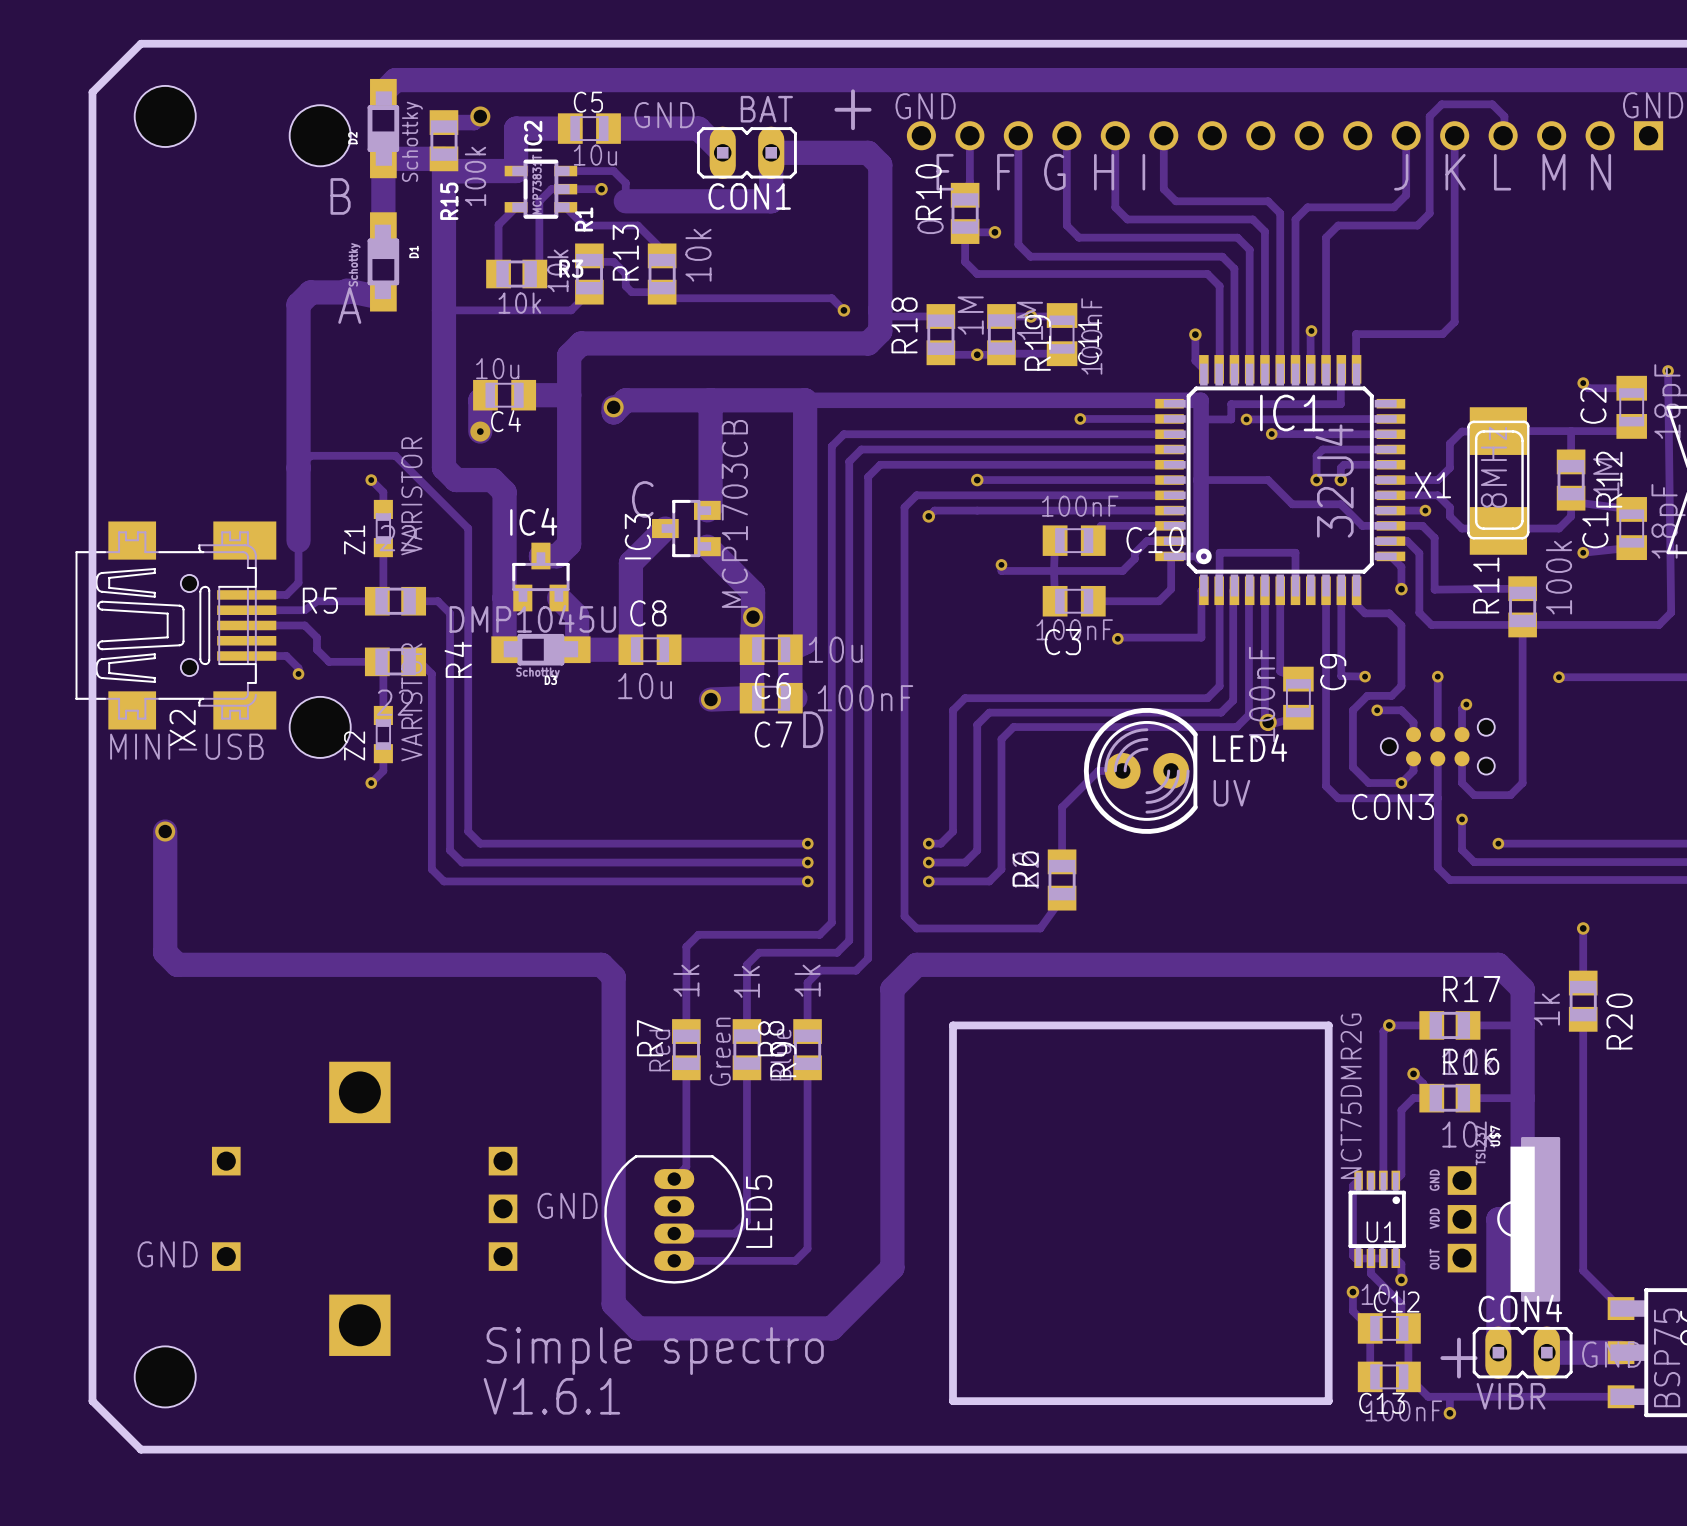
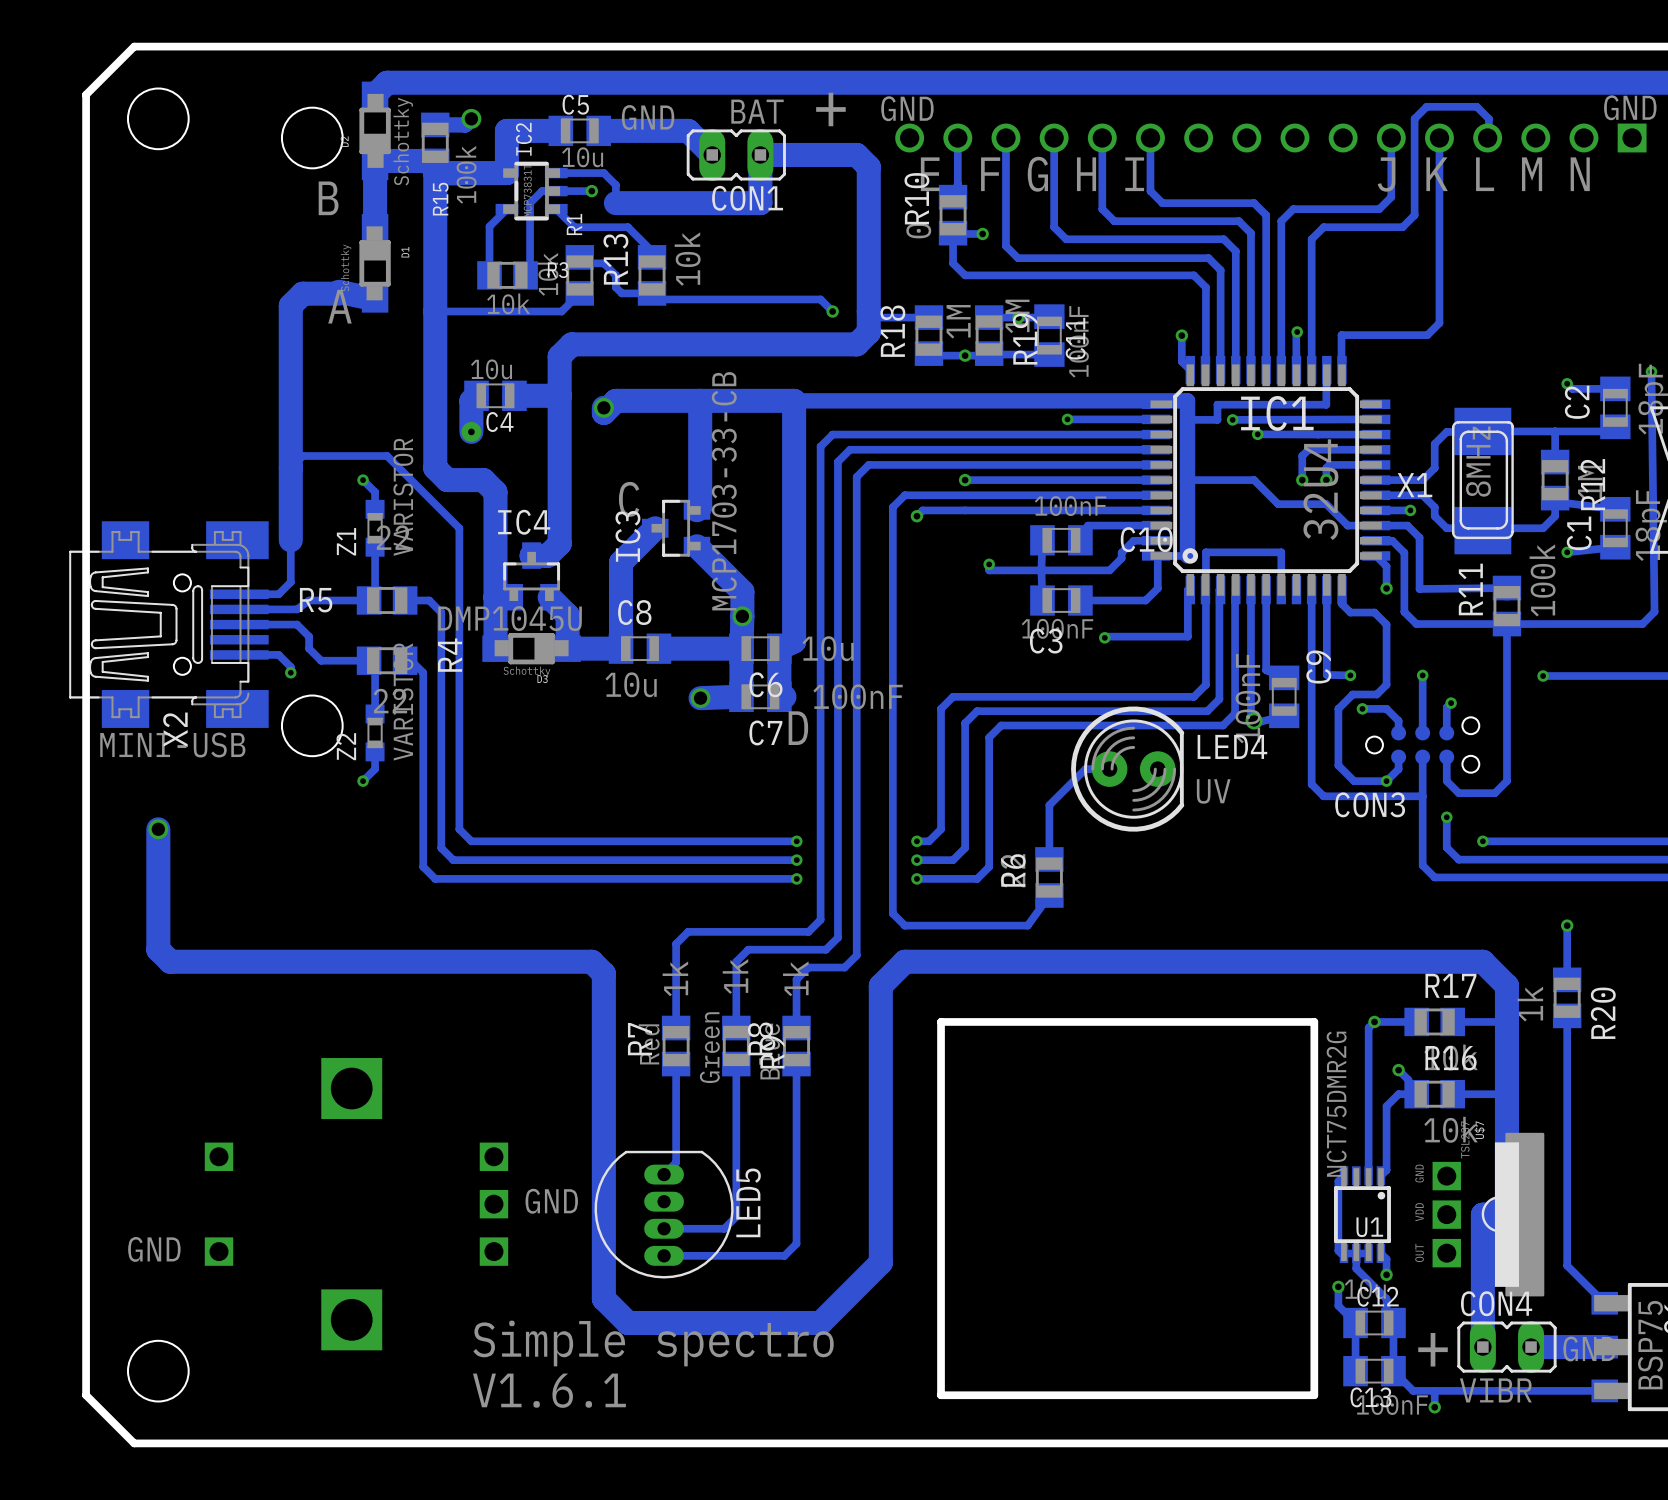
IC3 value: MCP1703CB (734, 513) -> MCP1703-33-CB (724, 491)

